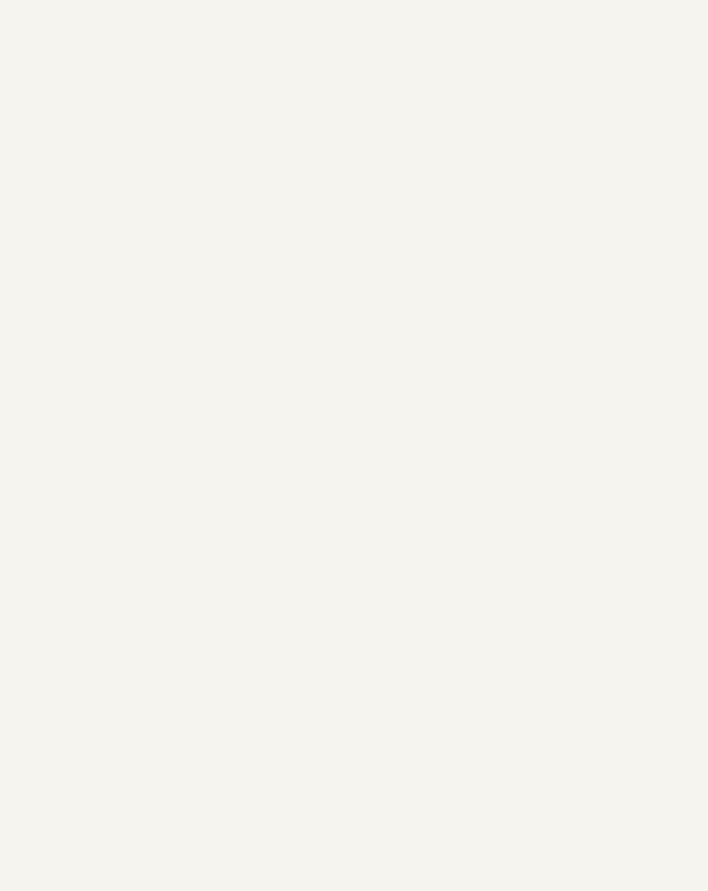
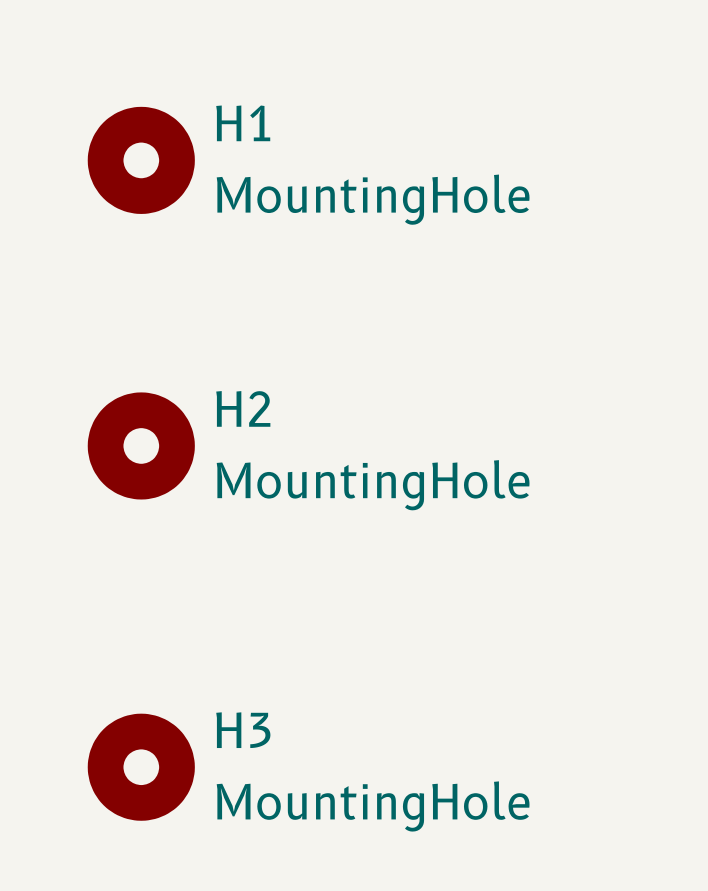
H1: none -> MountingHole (141, 160)
H2: none -> MountingHole (141, 445)
H3: none -> MountingHole (141, 767)

